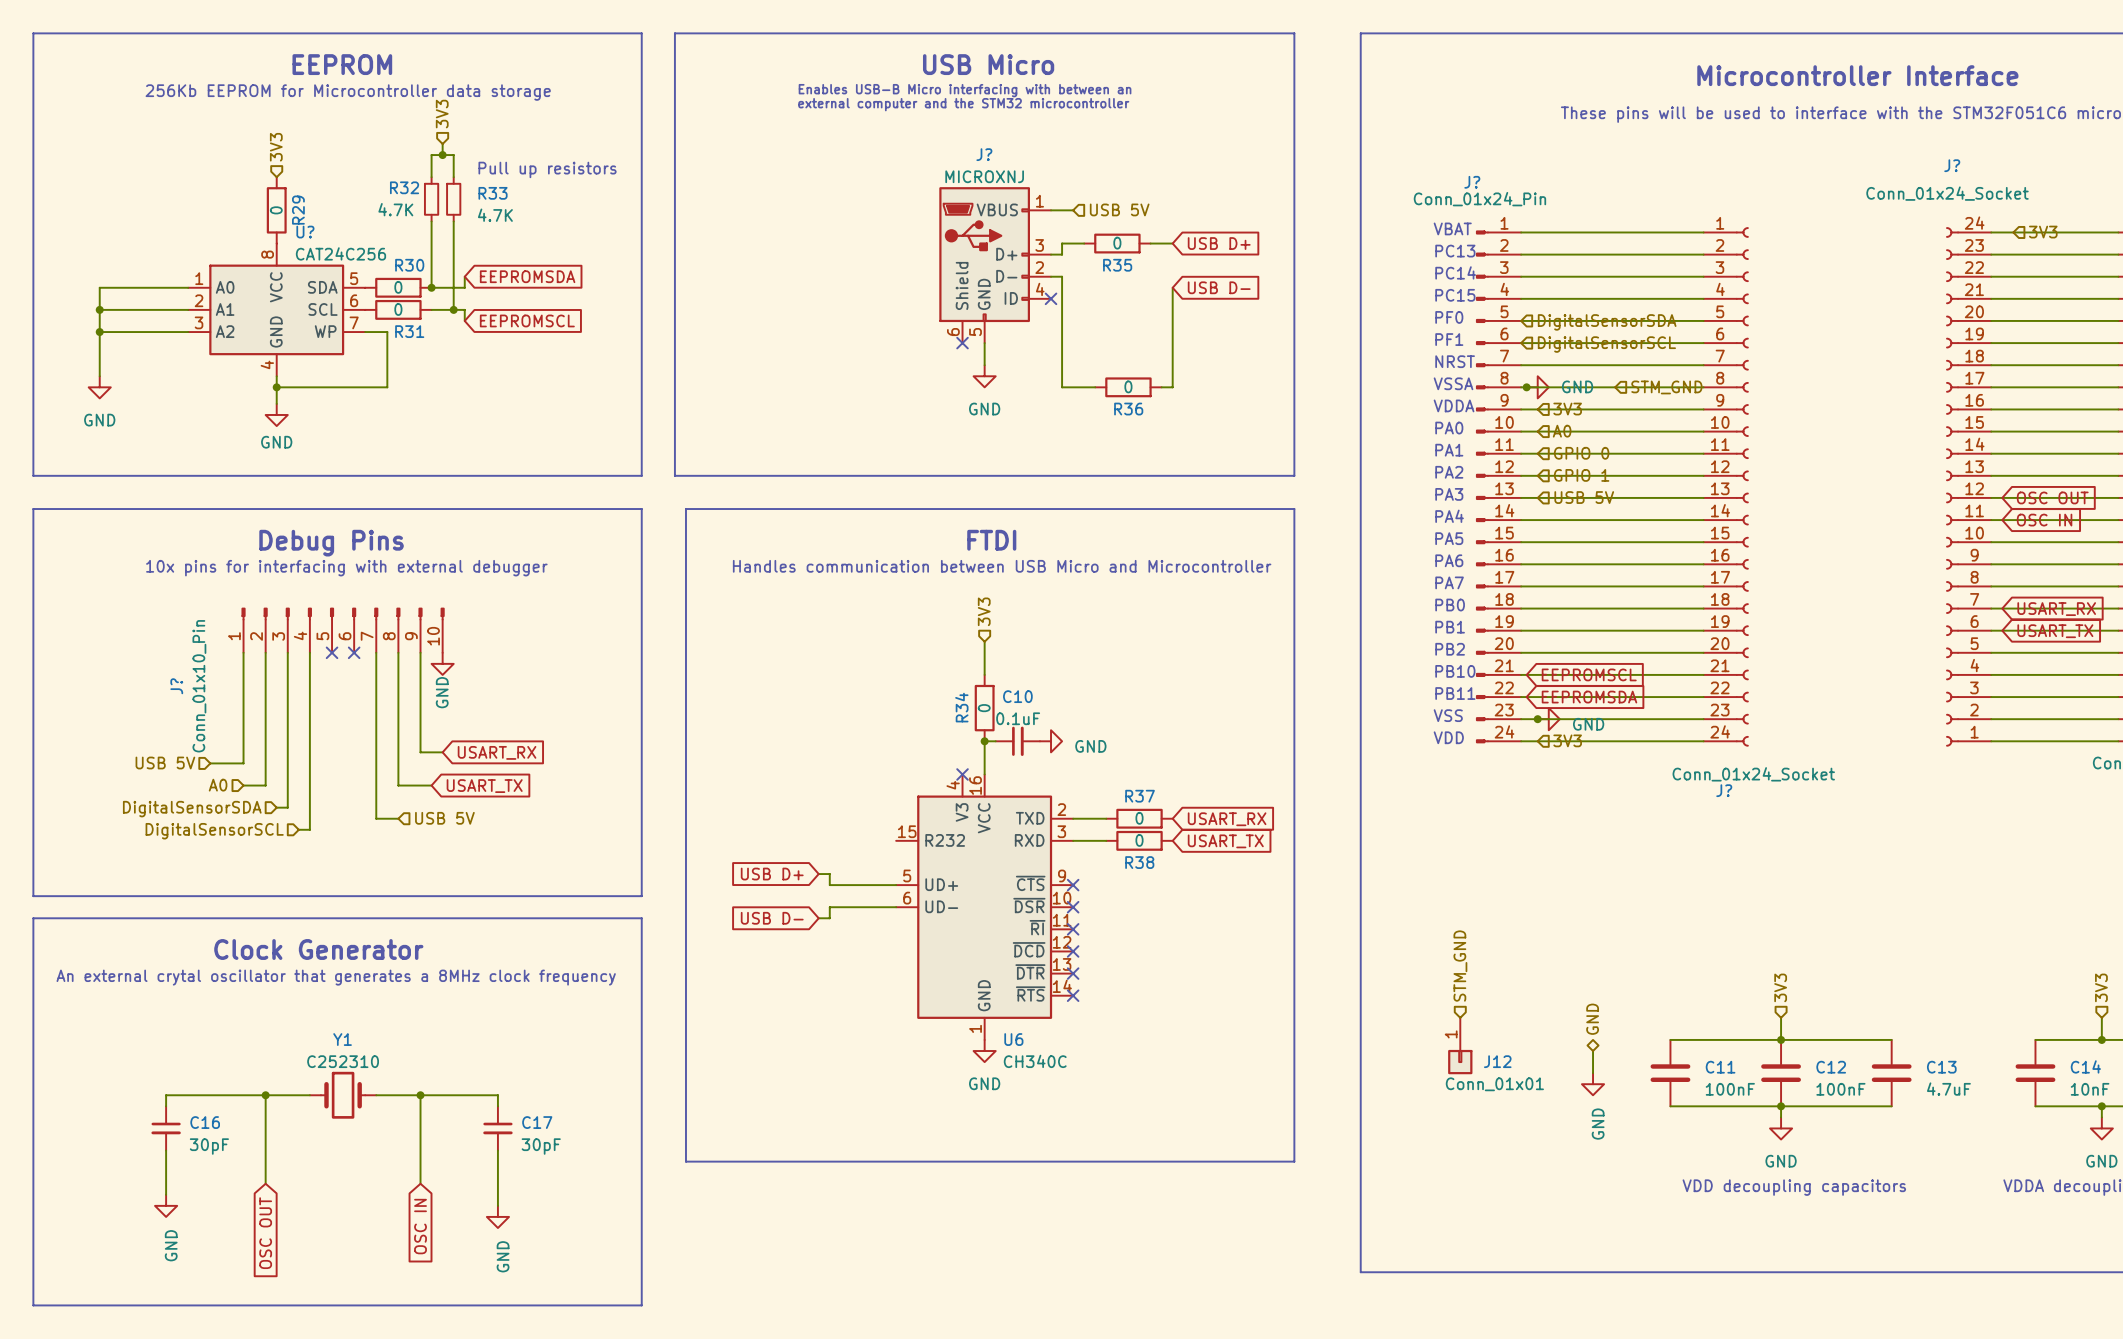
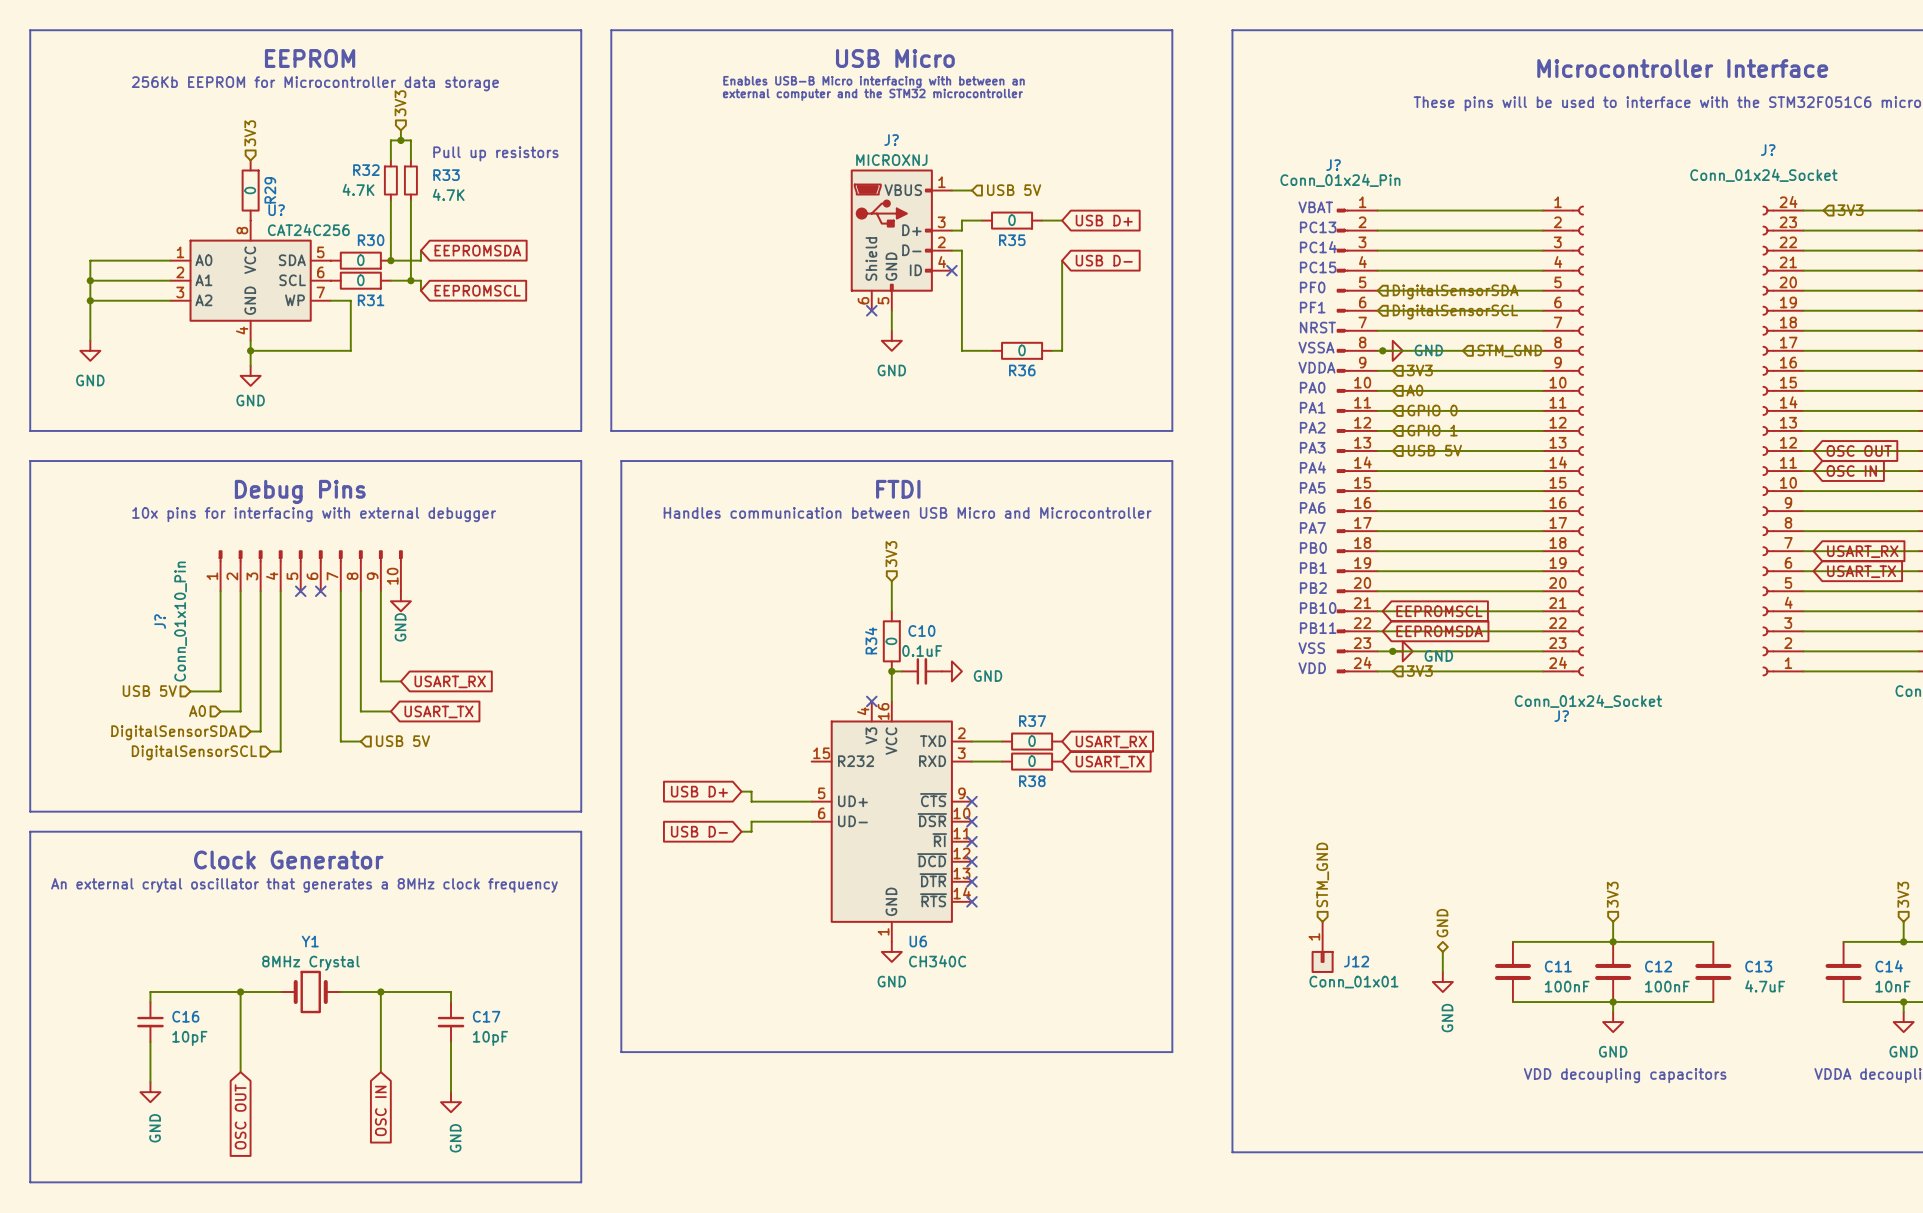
Y1 value: C252310 (343, 1061) -> 8MHz Crystal (310, 963)
C16 value: 30pF (209, 1146) -> 10pF (189, 1038)
C17 value: 30pF (541, 1146) -> 10pF (490, 1038)

